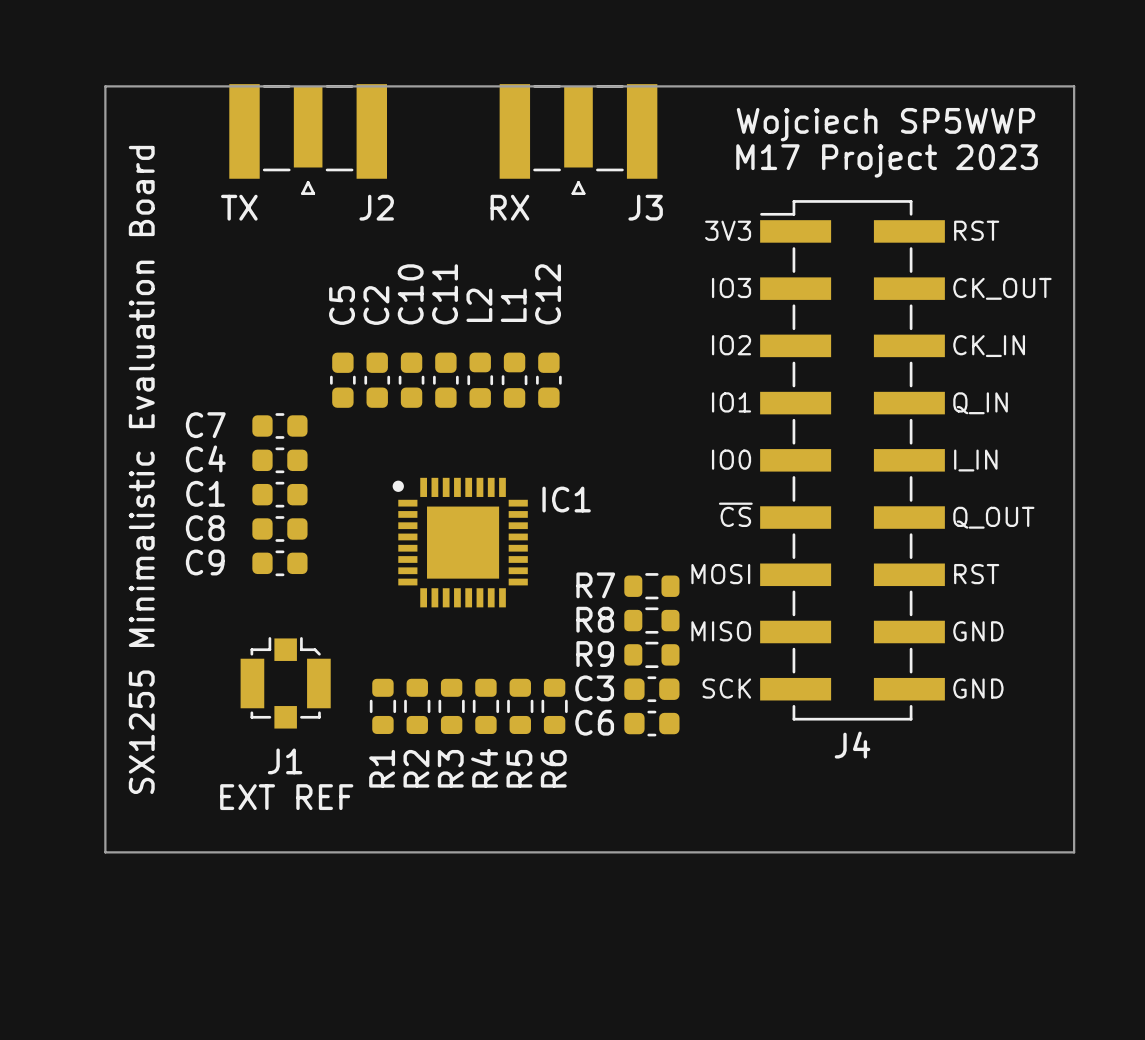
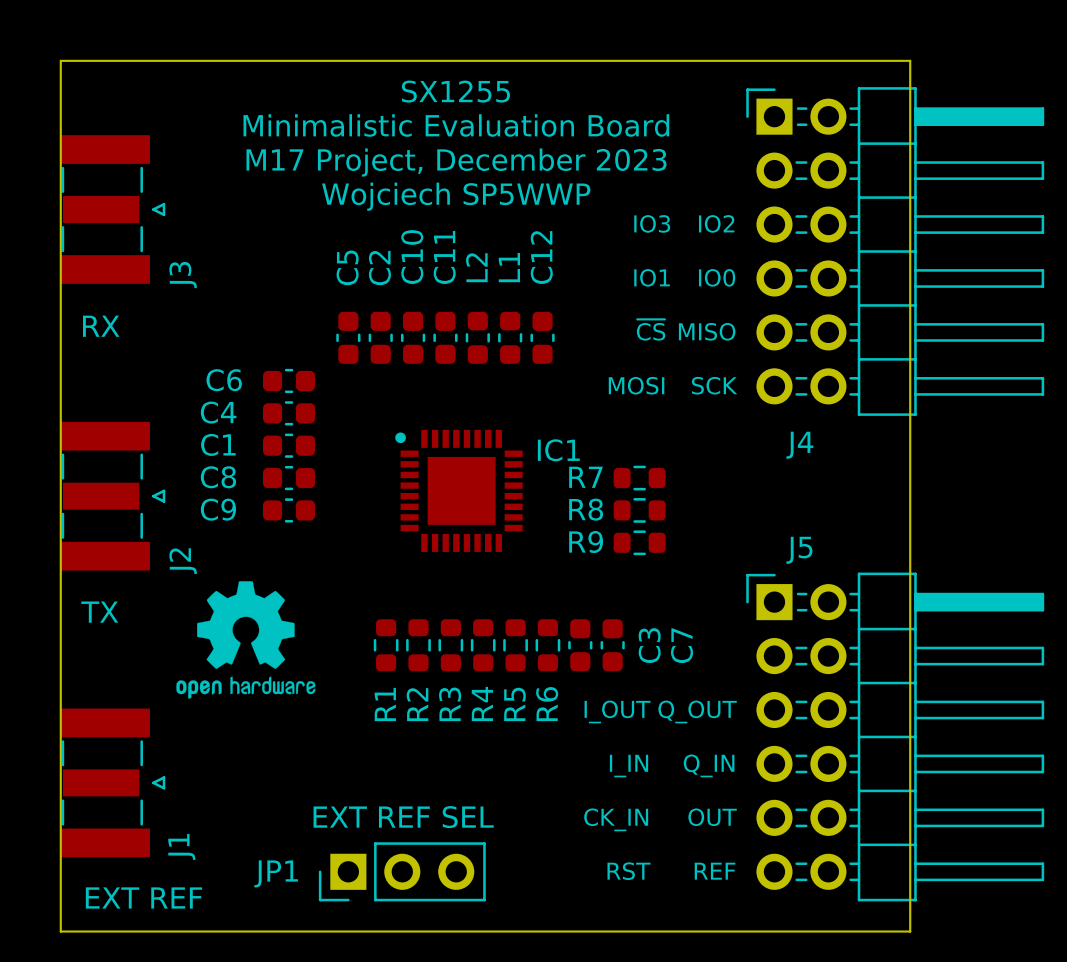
board edge: (105, 86) (105, 852) (1074, 852) (1074, 86) (938, 86) -> (124, 60) (60, 60) (60, 931) (910, 931) (910, 60)
text: none -> SX1255 (455, 91)
text position: Wojciech SP5WWP (885, 124) -> Wojciech SP5WWP (456, 196)
J2 rotation: 0° (308, 139) -> 90° counterclockwise (113, 496)
J2 position: (308, 139) -> (113, 496)
J3 rotation: 0° (578, 139) -> 90° counterclockwise (113, 209)
J3 position: (578, 139) -> (113, 209)
text: M17 Project 2023 (887, 160) -> M17 Project, December 2023 (456, 162)
J4 footprint: [760, 200, 945, 721] -> [746, 87, 1045, 416]
text position: TX (239, 207) -> TX (99, 612)
text position: RX (509, 207) -> RX (101, 326)
text: 3V3 (728, 230) -> none
text: RST (976, 230) -> none
text position: IO3 (731, 287) -> IO3 (652, 223)
text: CK_OUT (1002, 288) -> none
text position: IO2 (731, 345) -> IO2 (716, 223)
text: CK_IN (989, 346) -> none
text position: IO1 (731, 402) -> IO1 (652, 277)
text position: Q_IN (980, 403) -> Q_IN (709, 765)
C7 name: C7 (205, 425) -> C6 (224, 380)
text position: IO0 (731, 459) -> IO0 (717, 277)
text position: I_IN (975, 460) -> I_IN (629, 766)
text: SX1255 Minimalistic Evaluation Board (141, 469) -> Minimalistic Evaluation Board (456, 125)
text position: ~{CS} (735, 514) -> ~{CS} (651, 329)
text position: Q_OUT (993, 517) -> Q_OUT (697, 711)
text position: MOSI (720, 574) -> MOSI (636, 385)
text: RST (976, 574) -> none
R7 position: (651, 586) -> (639, 478)
R8 position: (651, 620) -> (639, 510)
text position: MISO (721, 631) -> MISO (707, 331)
text: GND (978, 631) -> none
J1 footprint: [240, 637, 331, 729] -> [60, 708, 166, 858]
drawing: none -> [176, 581, 316, 699]
R9 position: (651, 654) -> (639, 542)
C3 name position: C3 (594, 688) -> C3 (649, 645)
text position: SCK (726, 688) -> SCK (714, 385)
text: GND (978, 688) -> none
C3 rotation: 0° (651, 689) -> 90° clockwise (580, 645)
C3 position: (651, 689) -> (580, 645)
C7: none -> (612, 645)
C6: (651, 723) -> none
J4 name position: J4 (852, 745) -> J4 (799, 445)
J1 name position: J1 (285, 761) -> J1 (181, 846)
text: none -> I_OUT (617, 711)
text position: EXT REF (286, 797) -> EXT REF (143, 897)
J5: none -> (895, 736)
text: none -> EXT REF SEL (403, 817)
text: none -> OUT (712, 817)
text: none -> CK_IN (616, 819)
JP1: none -> (402, 871)
text: none -> RST (628, 871)
text: none -> REF (715, 871)

